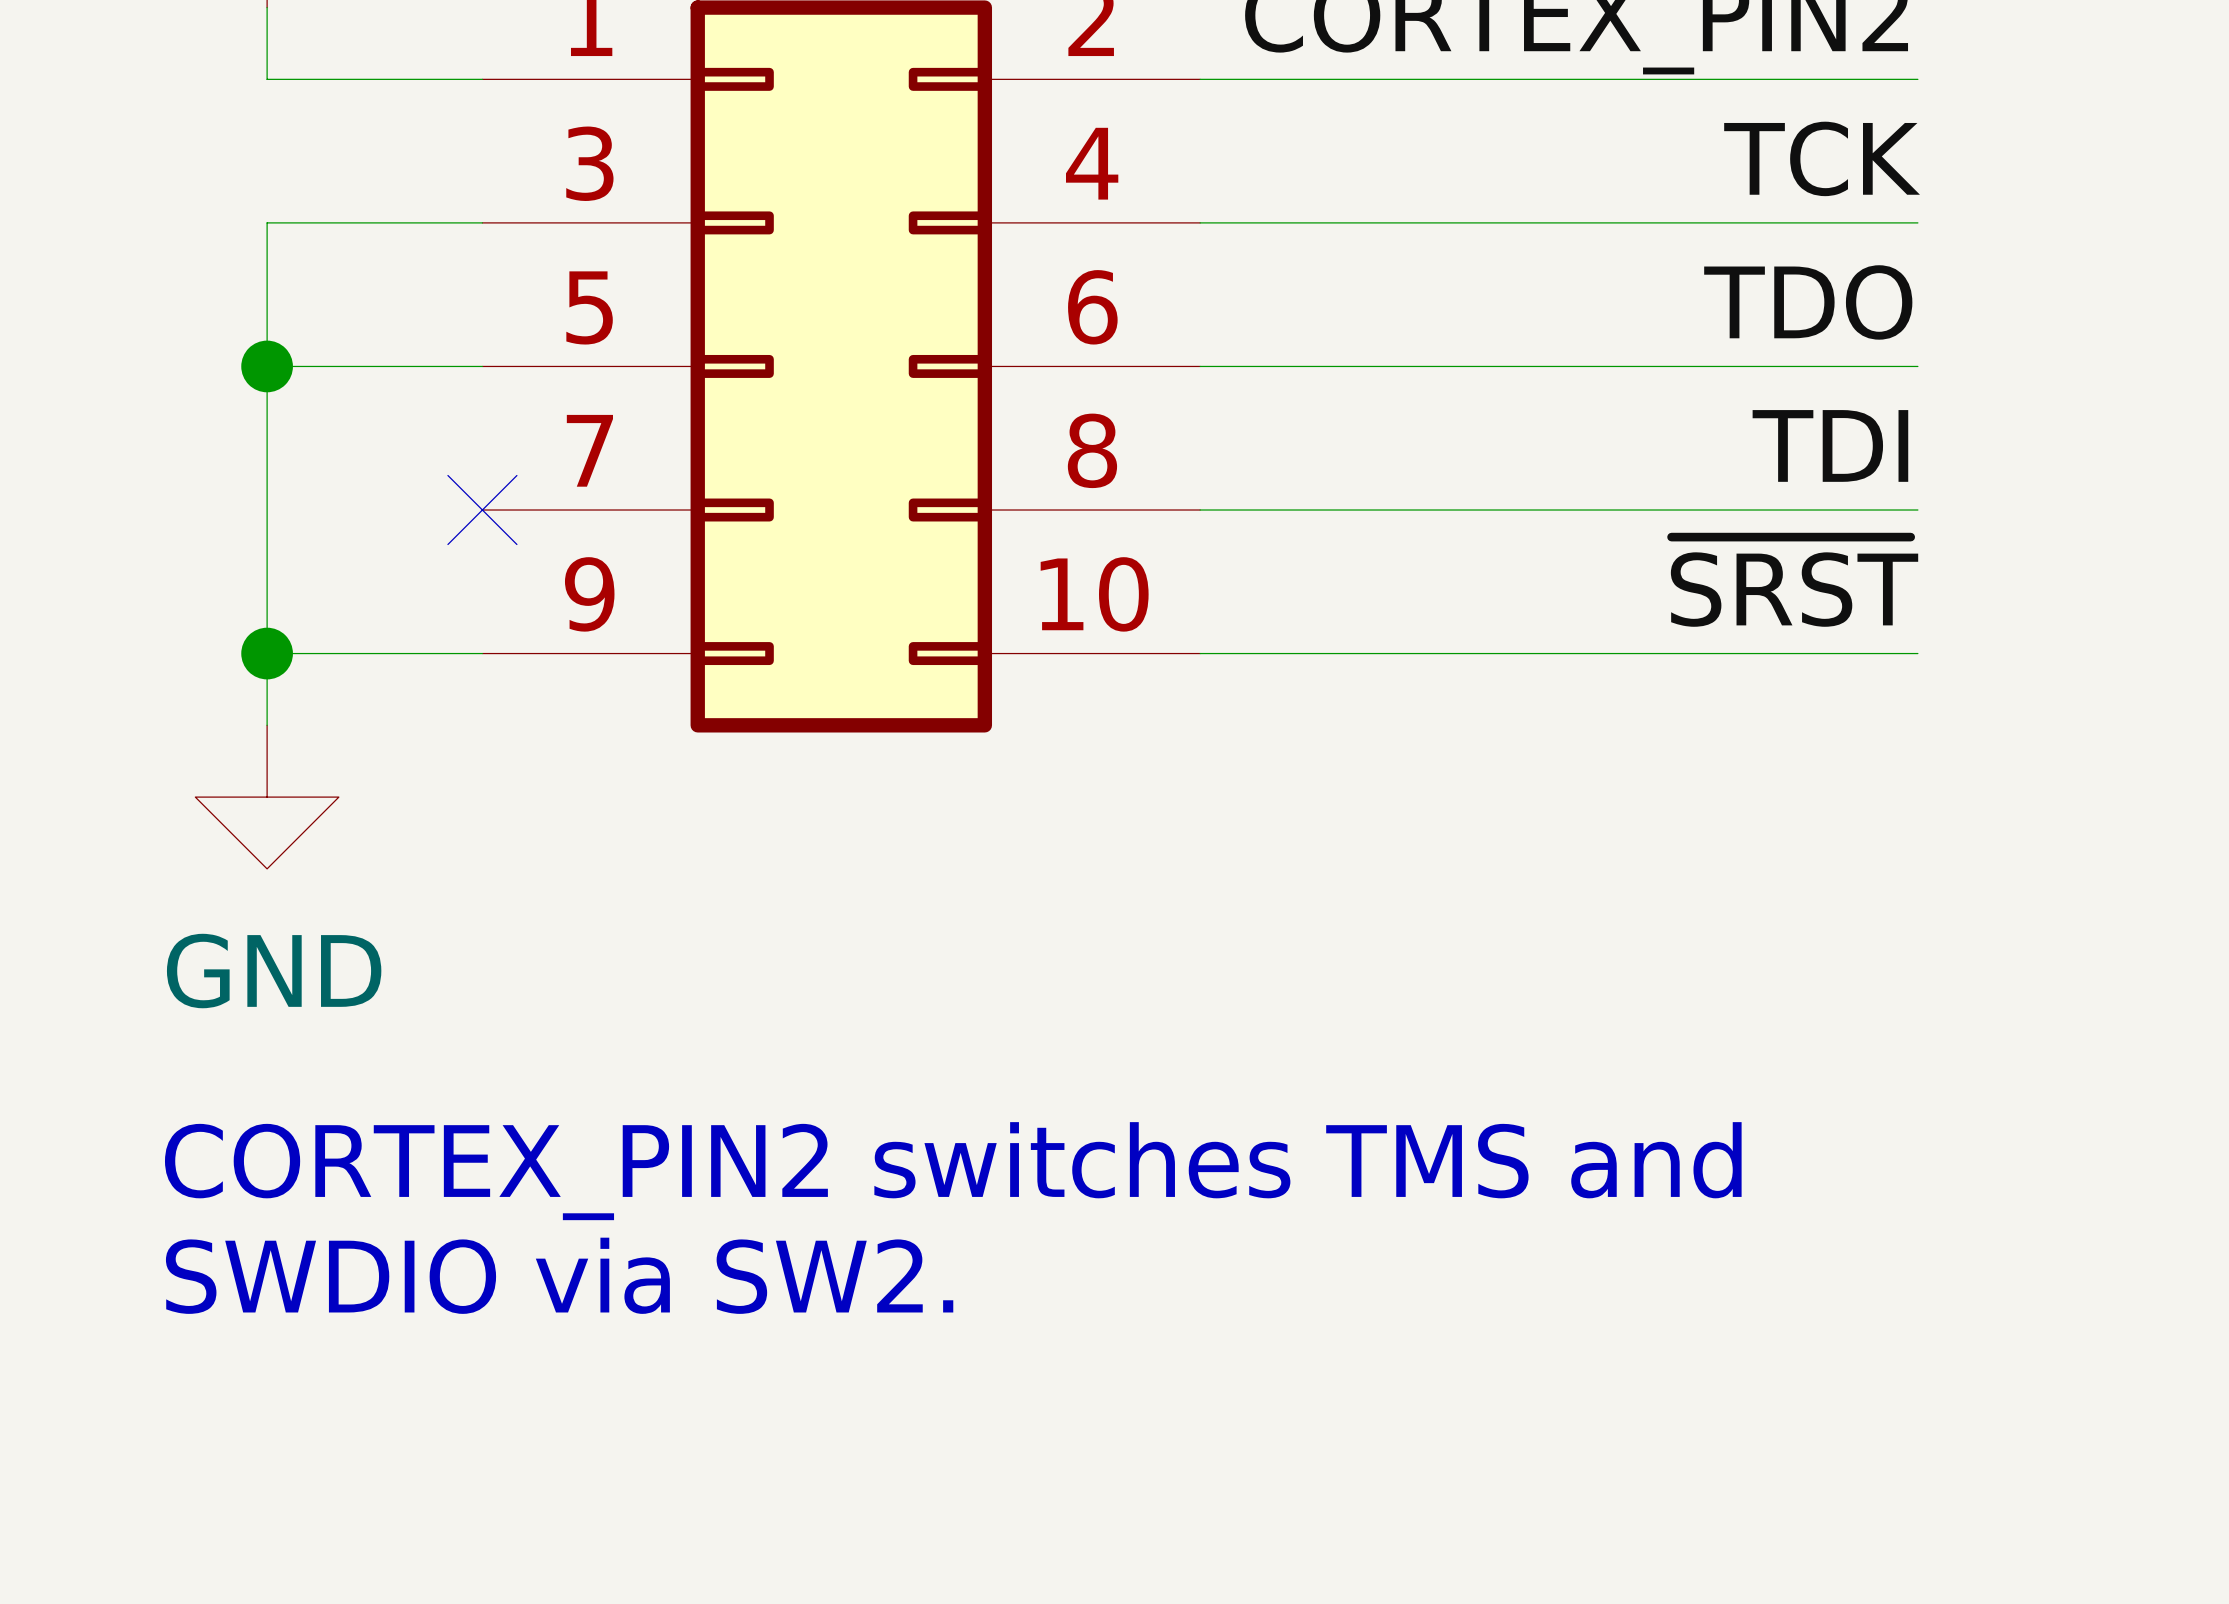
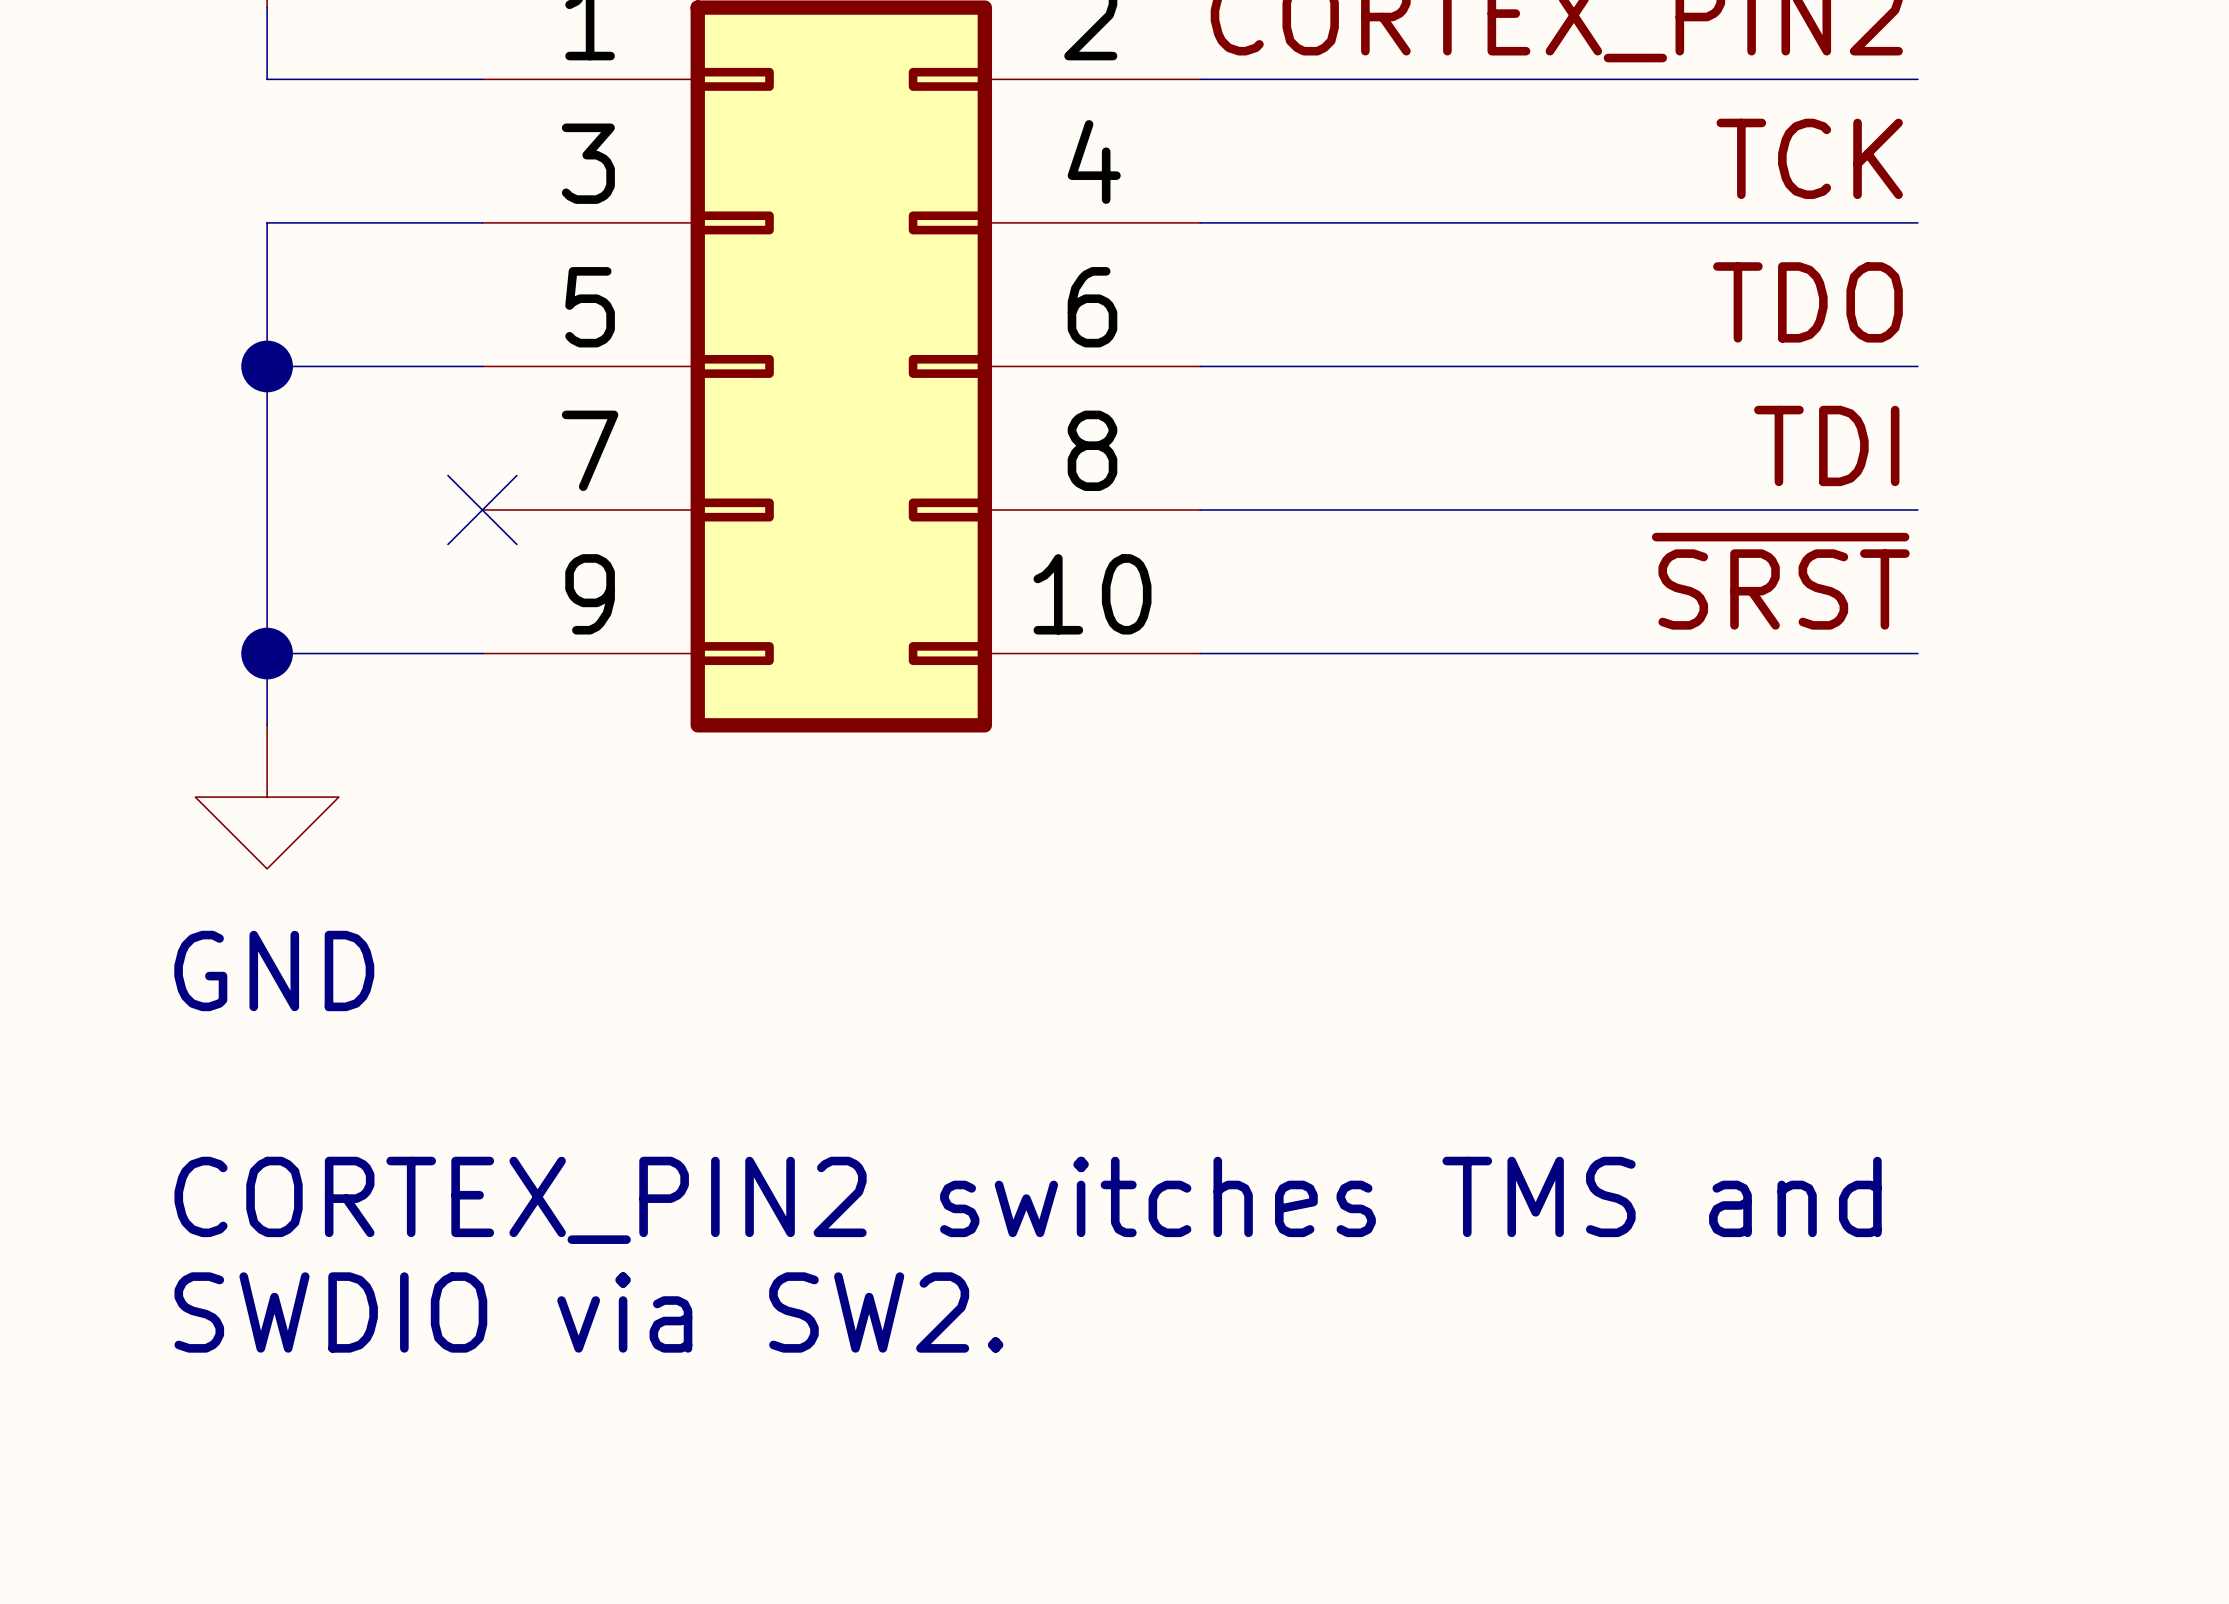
text position: CORTEX_PIN2 switches TMS and (953, 1171) -> CORTEX_PIN2 switches TMS and (1028, 1200)
text position: SWDIO via SW2. (559, 1275) -> SWDIO via SW2. (588, 1312)

